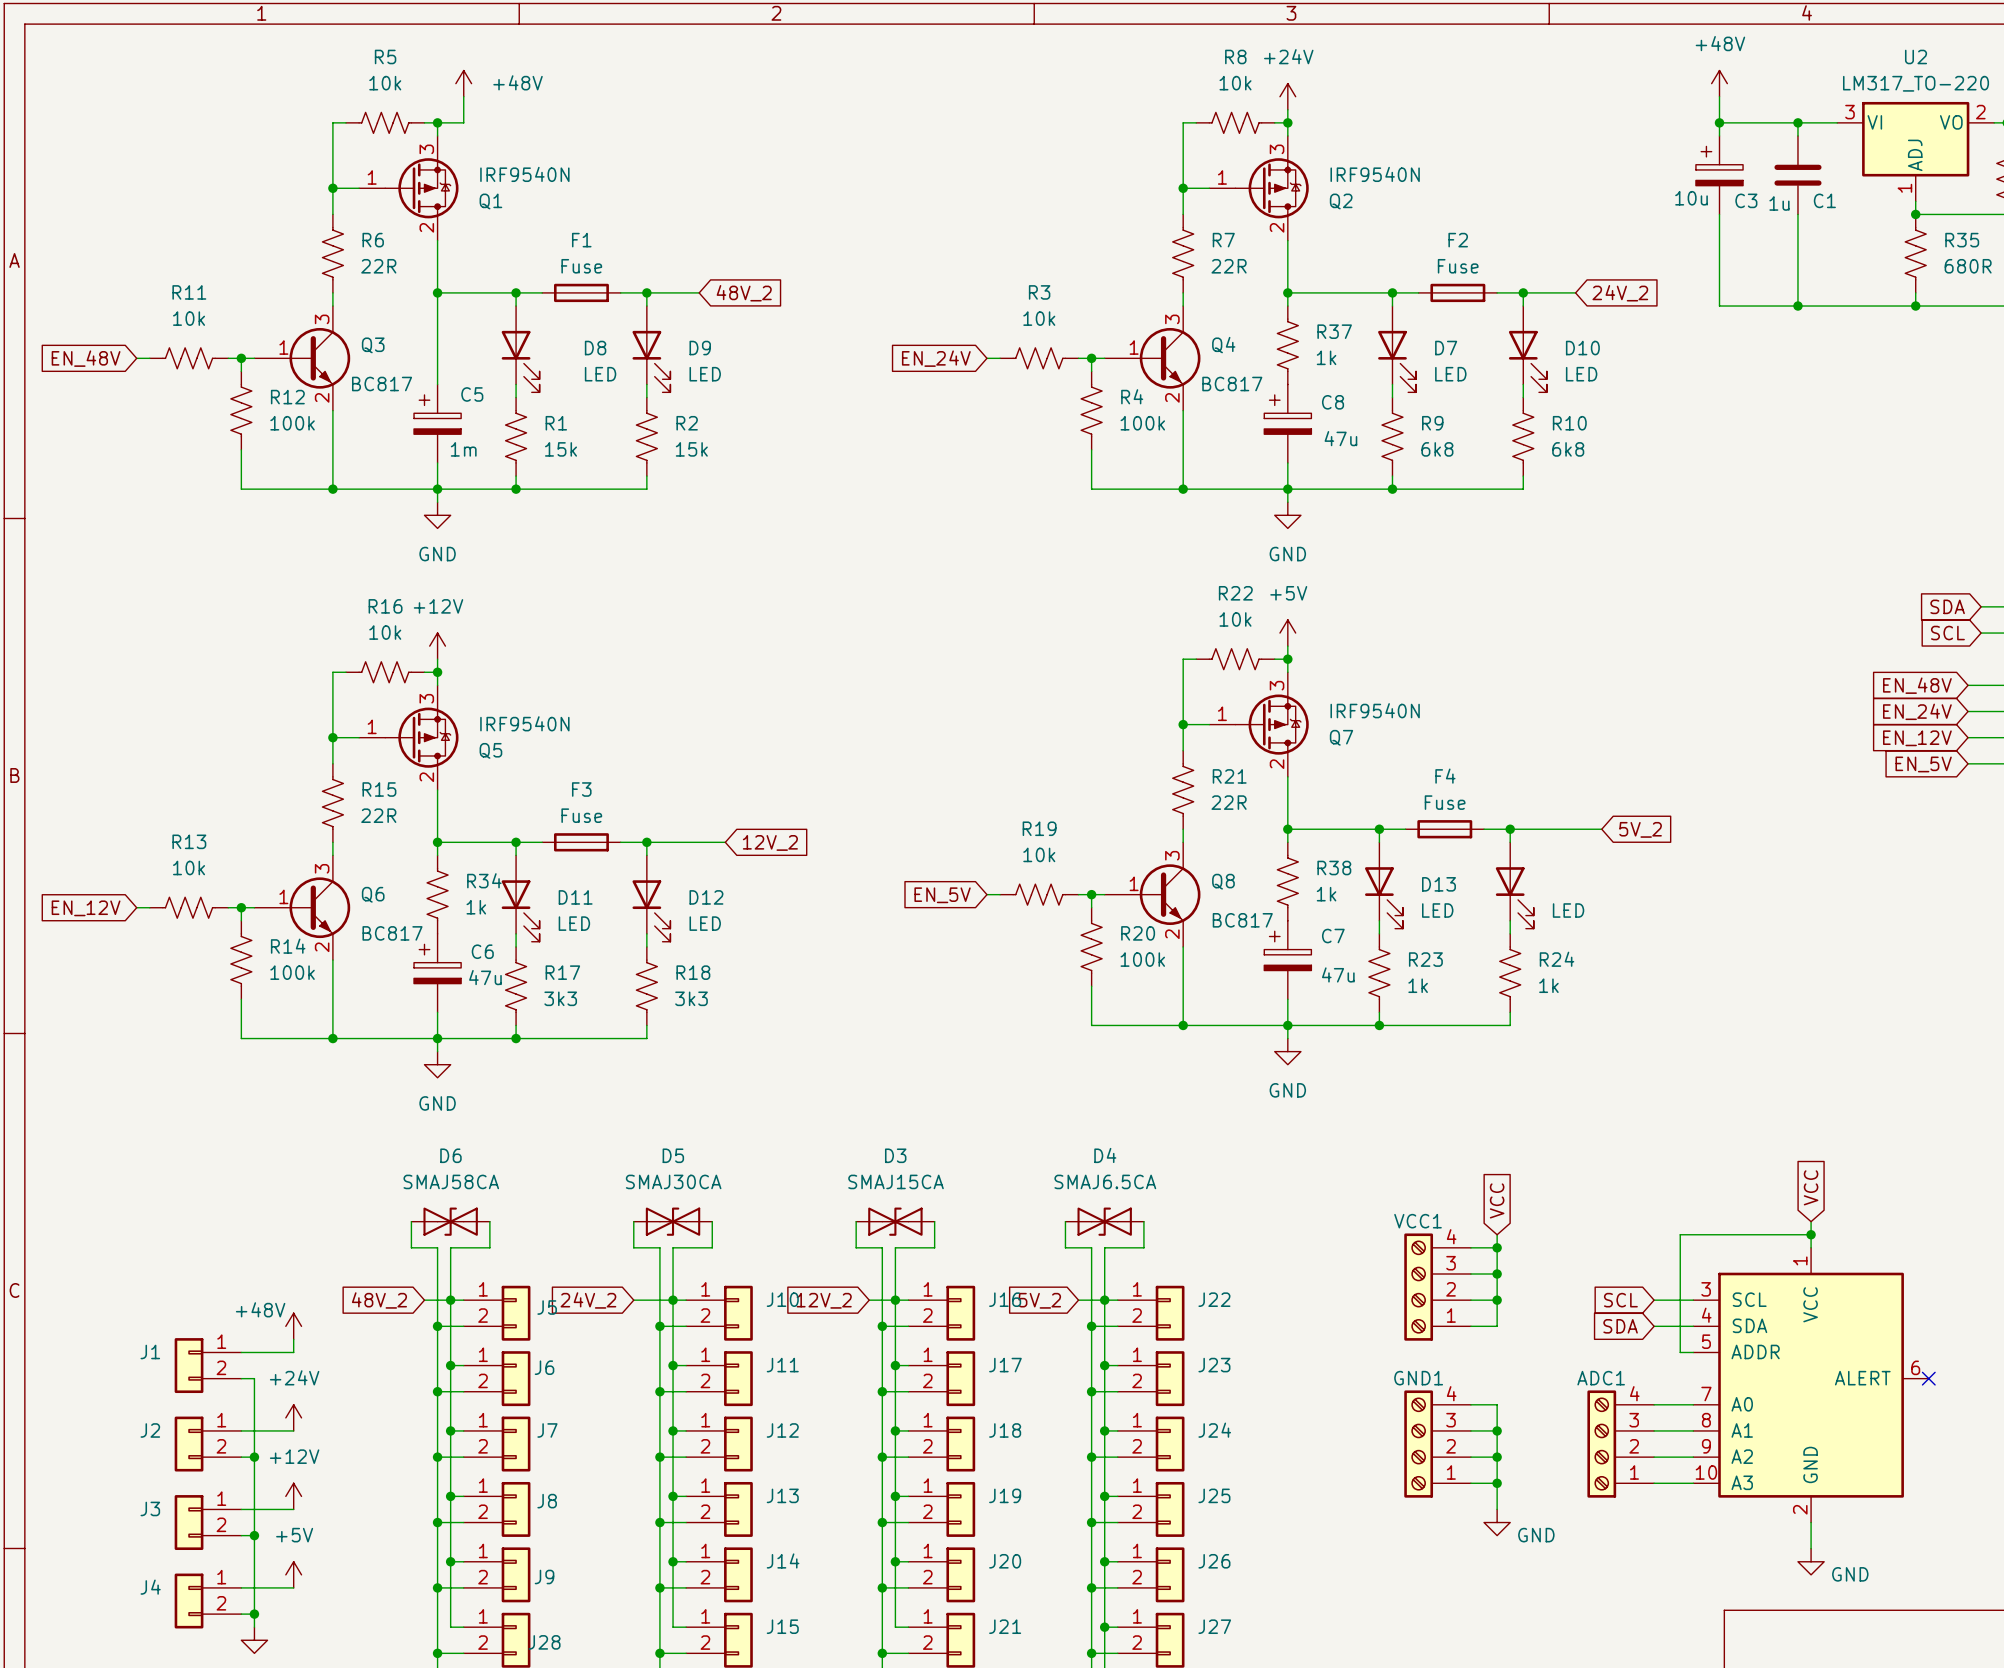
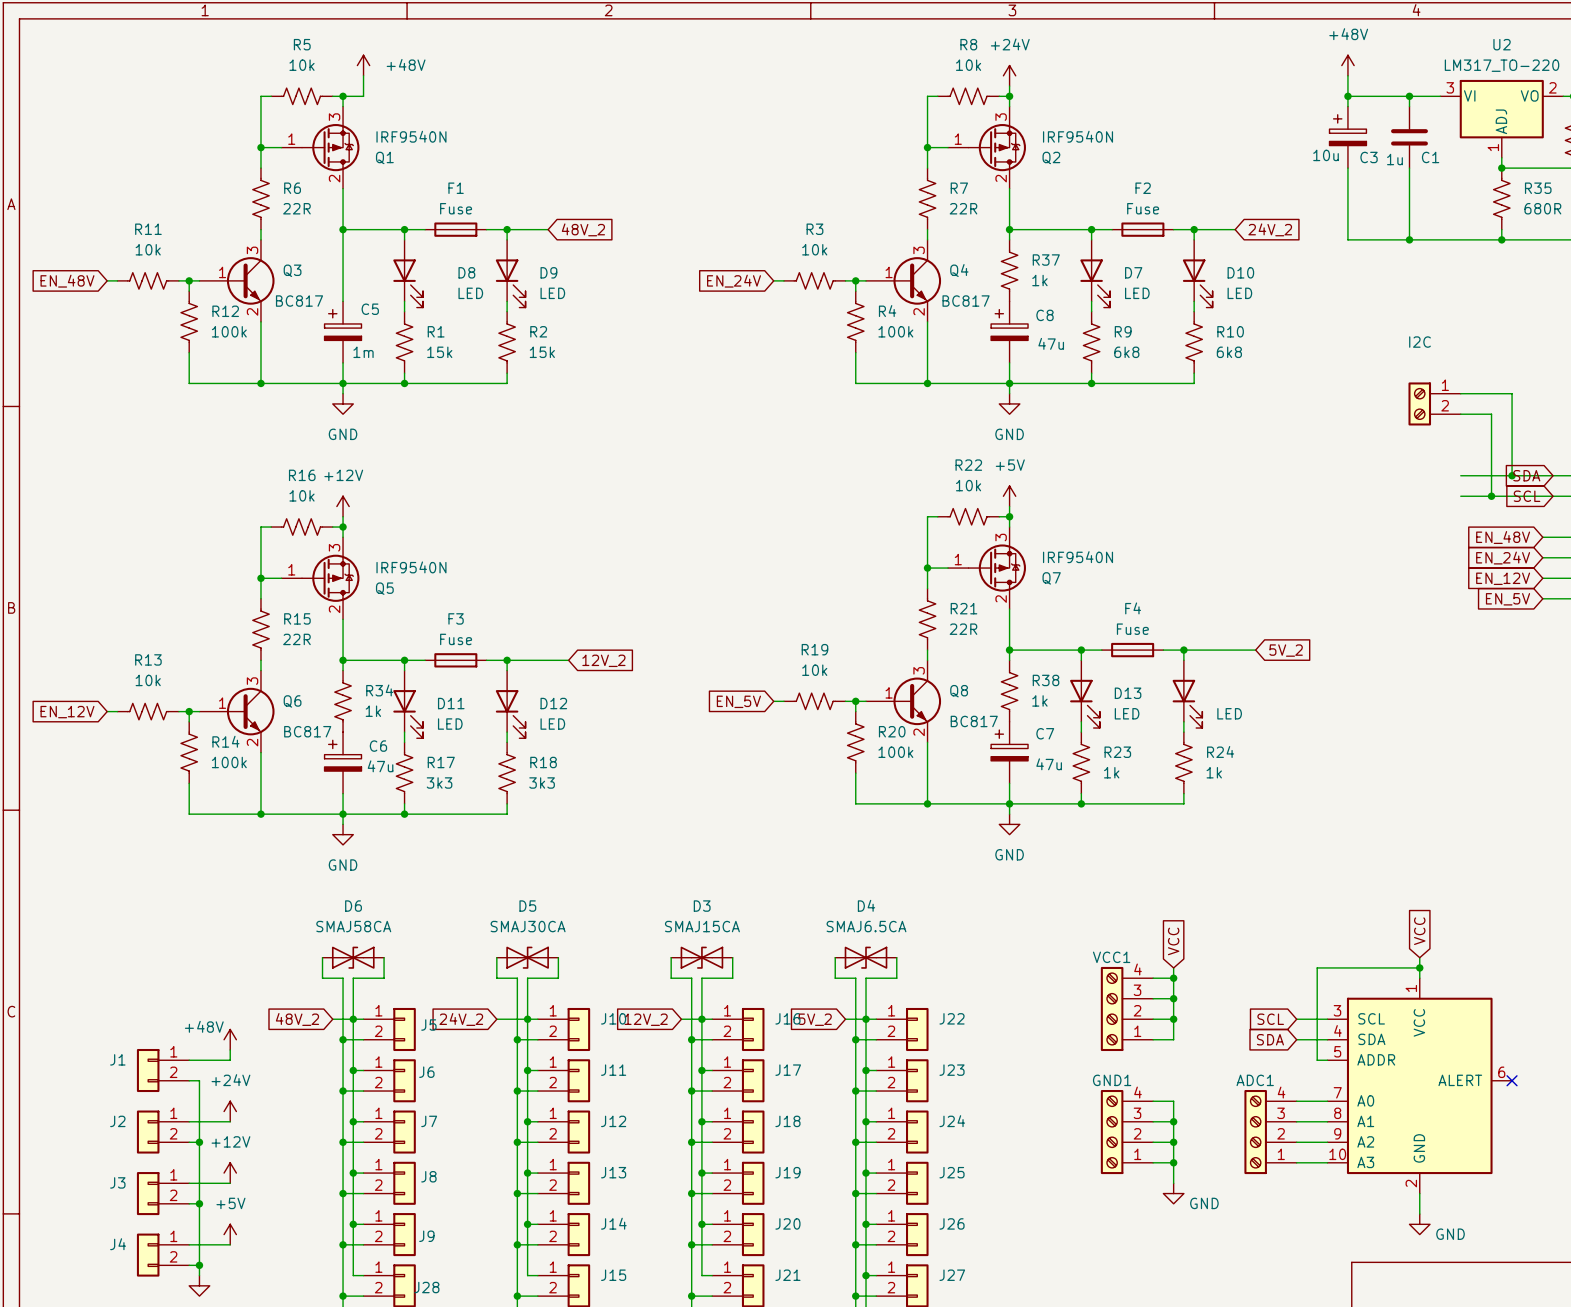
wire: none -> (1460, 393) (1512, 393) (1512, 475)
I2C: none -> (1434, 403)
wire: none -> (1460, 414) (1491, 414) (1491, 496)
wire: none -> (1460, 475) (1553, 475)
junction: none -> (1512, 475)
wire: none -> (1460, 496) (1553, 496)
junction: none -> (1491, 496)

